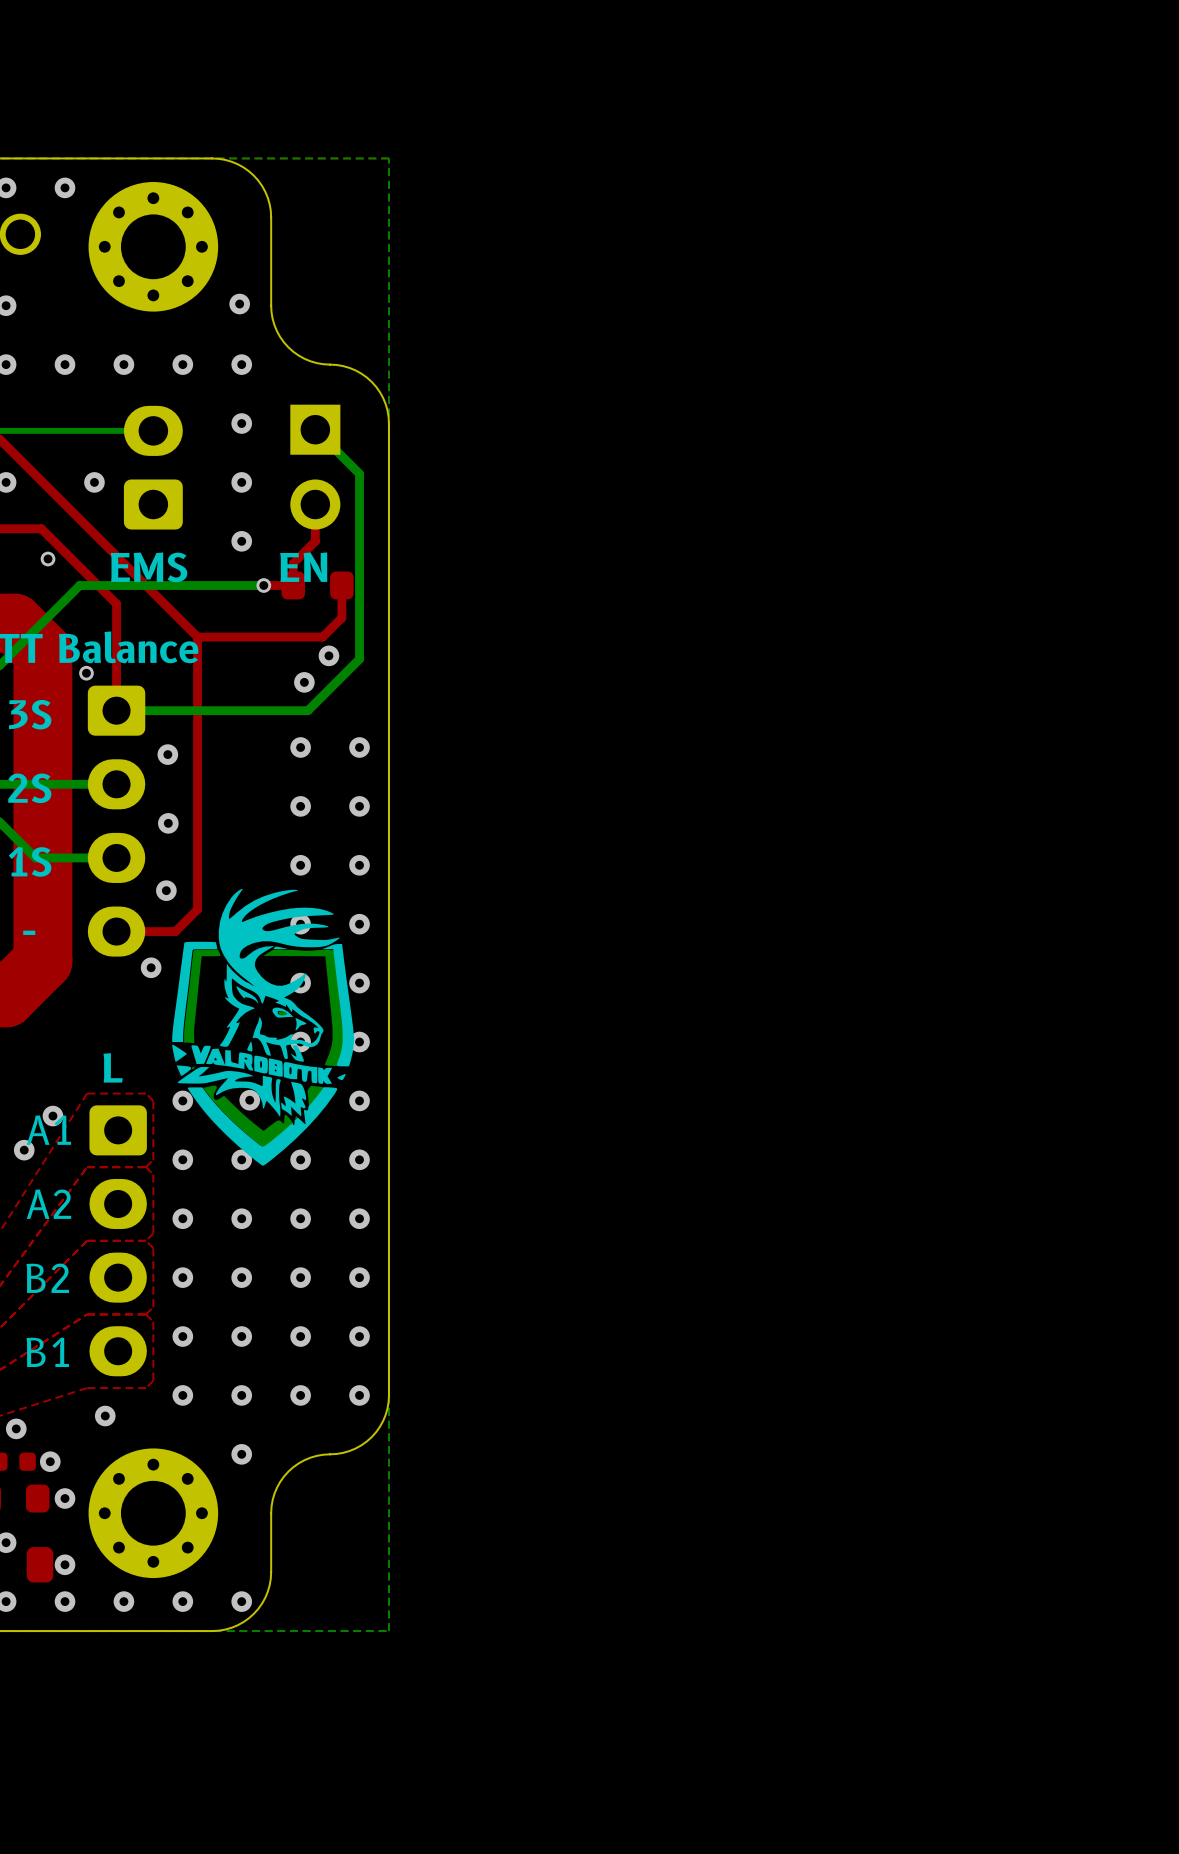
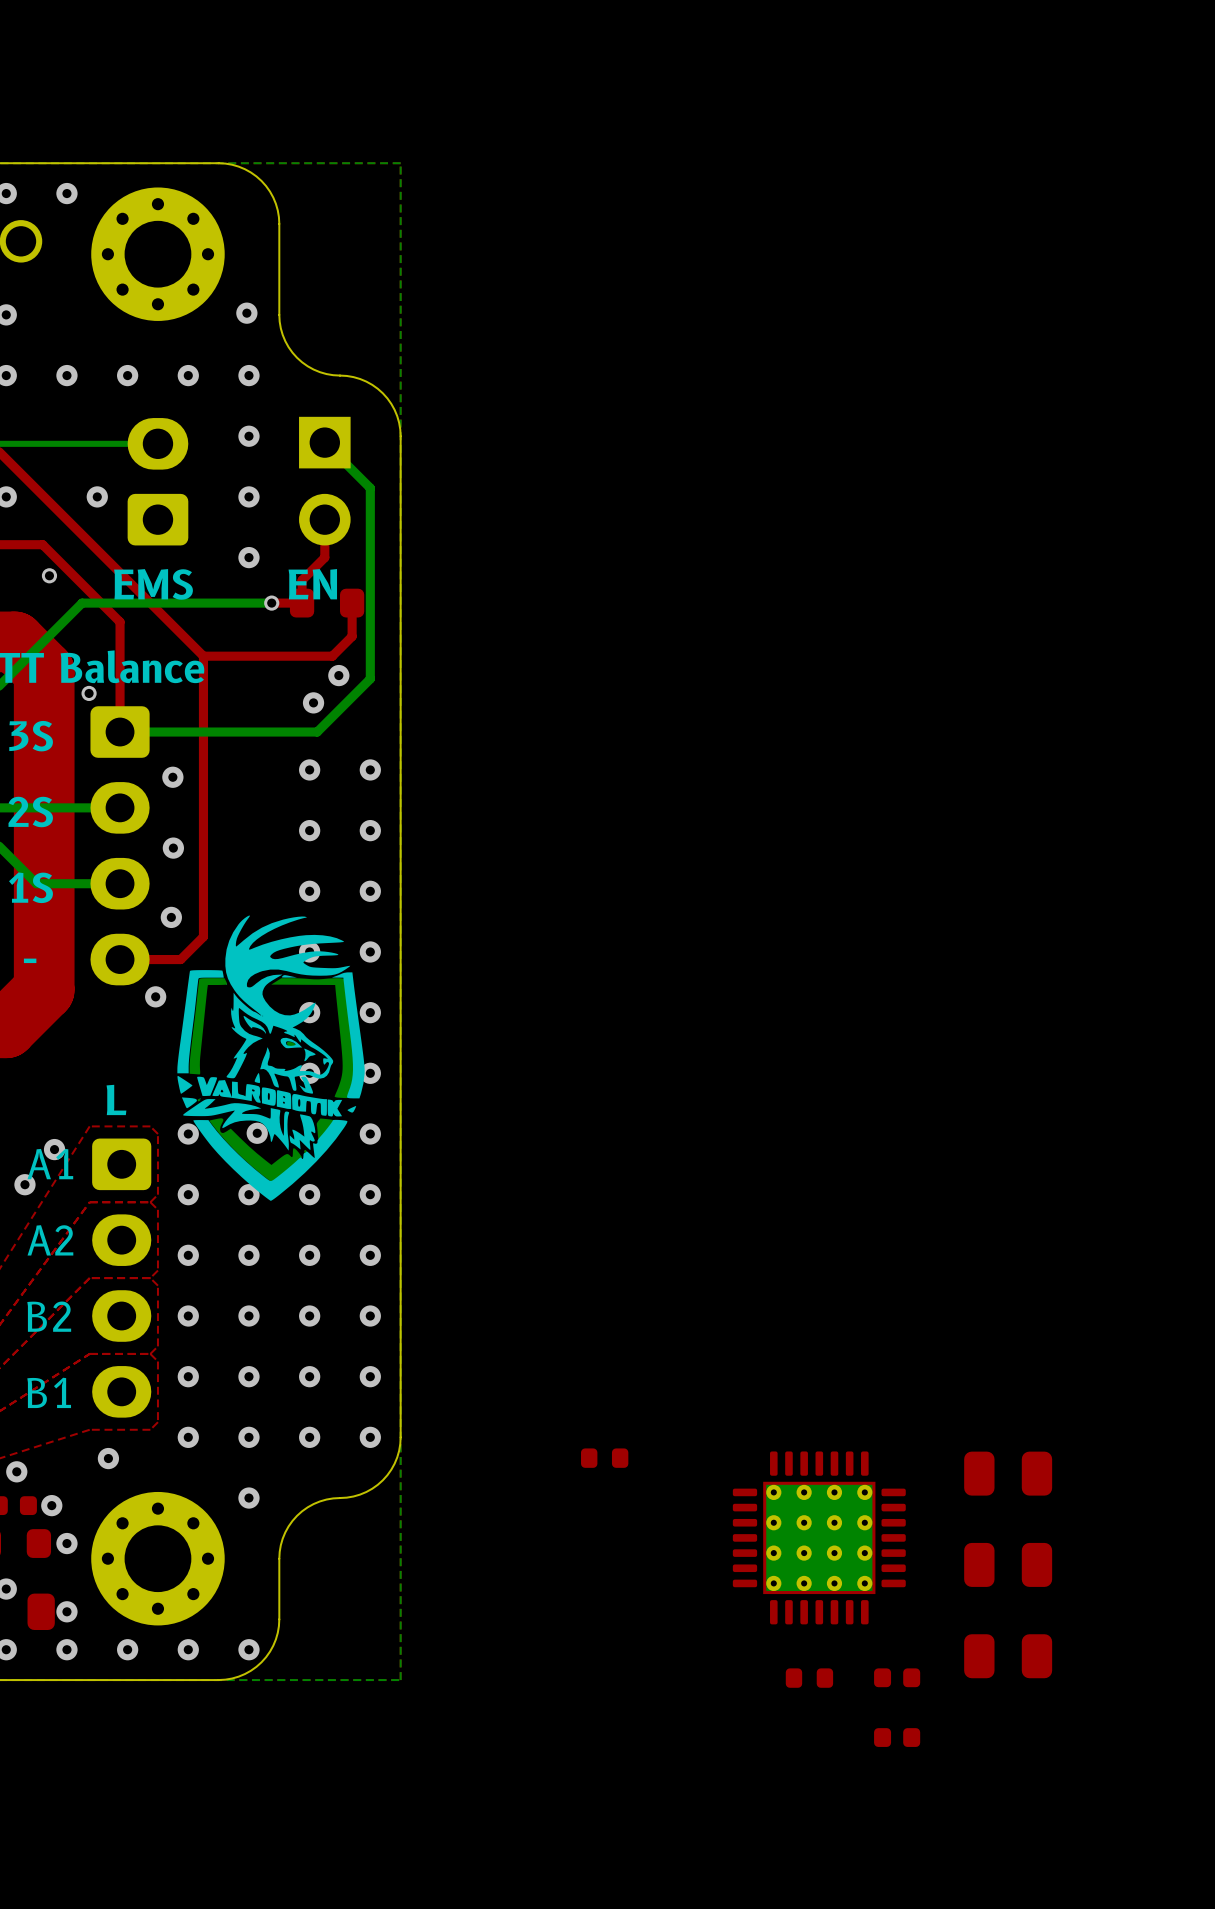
part: none -> (604, 1458)
part: none -> (1008, 1473)
part: none -> (819, 1537)
part: none -> (1008, 1564)
part: none -> (1008, 1656)
part: none -> (897, 1677)
part: none -> (809, 1678)
part: none -> (897, 1737)

